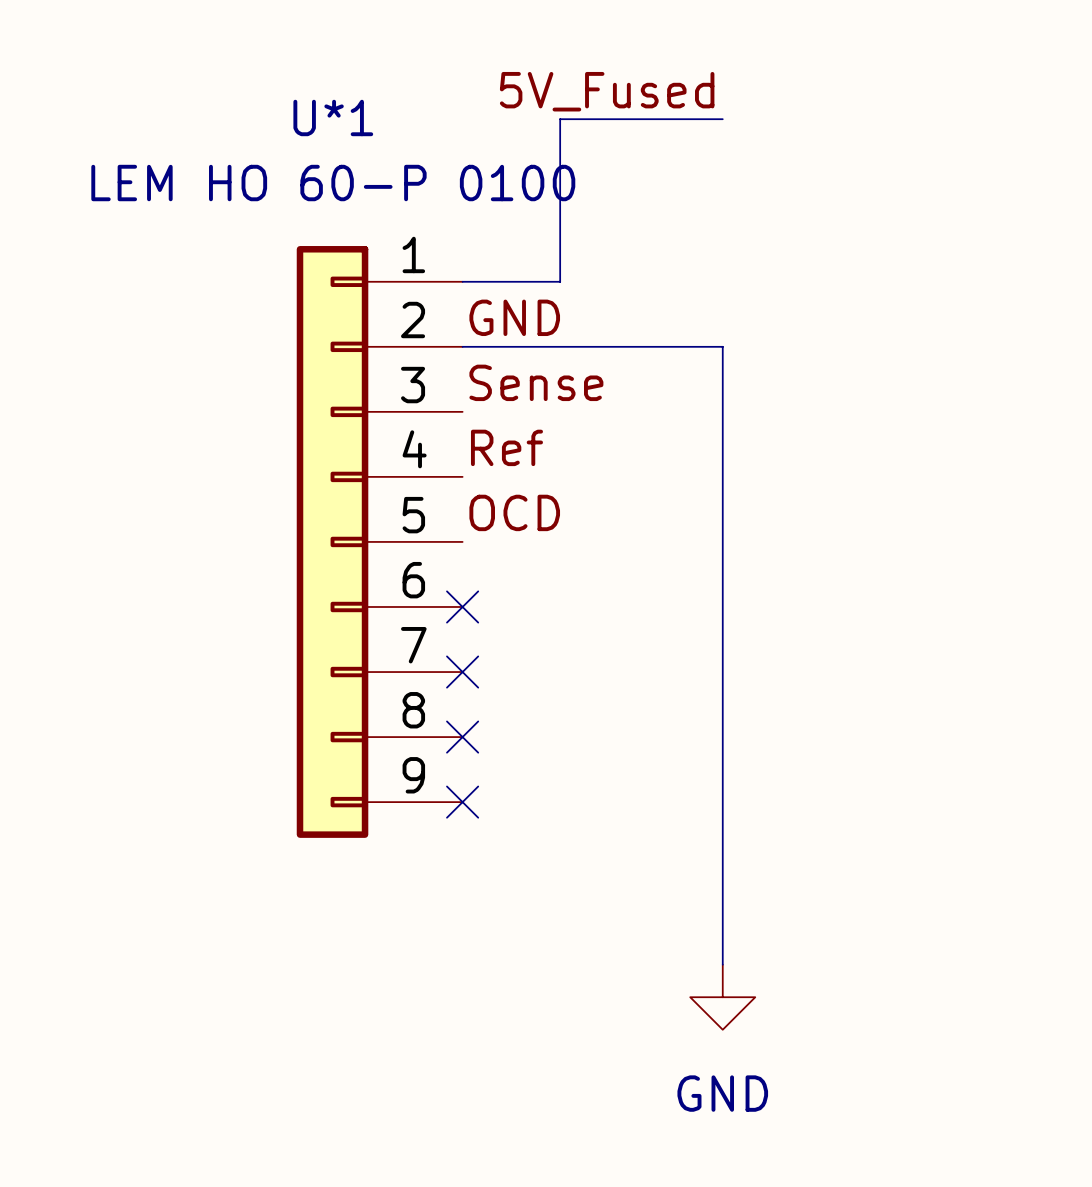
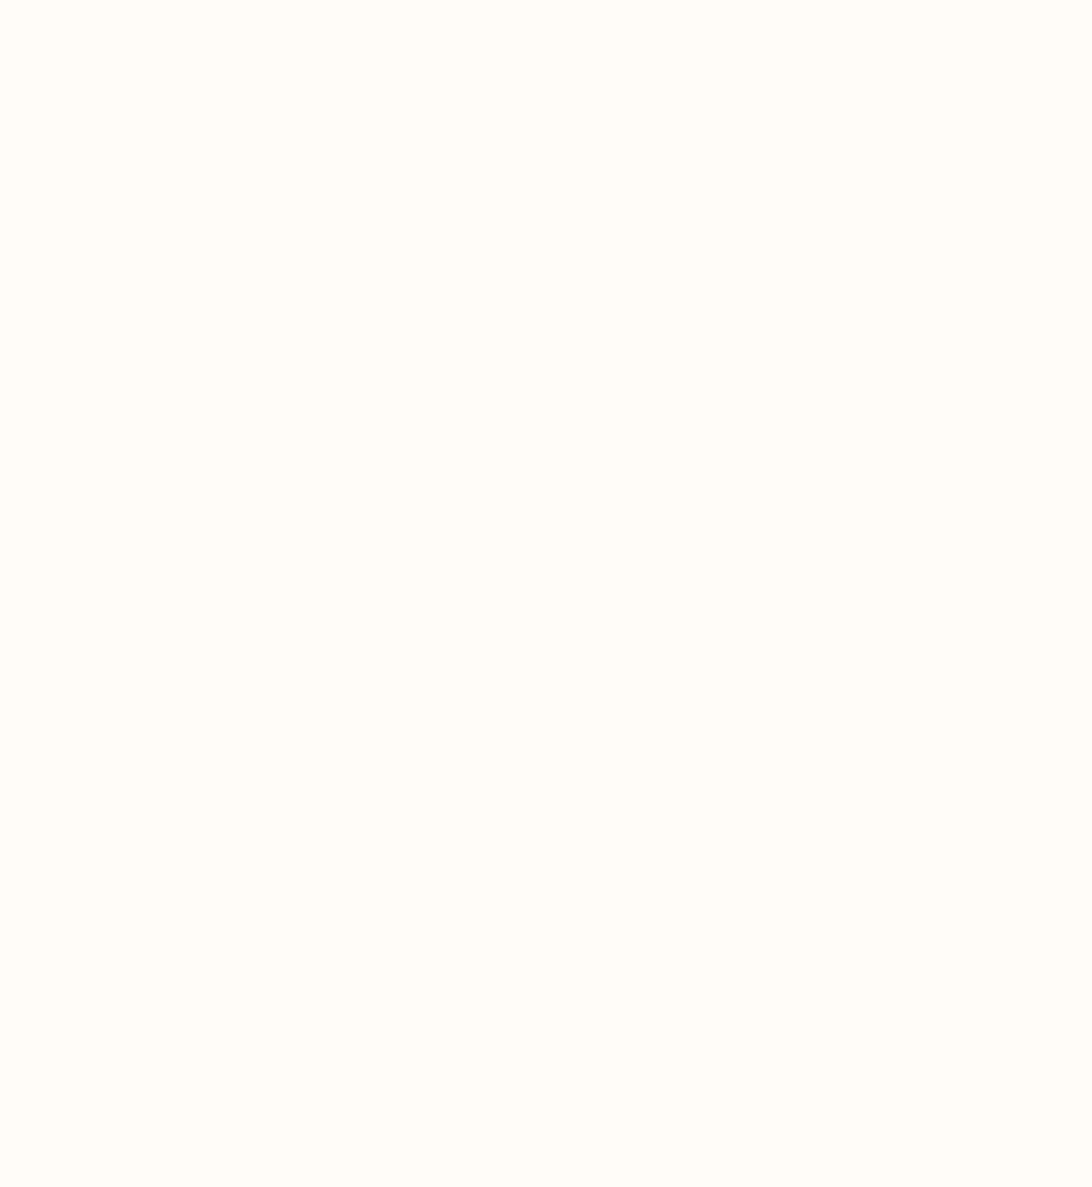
label: 5V_Fused (607, 91) -> none
wire: (722, 119) (560, 119) (560, 281) (462, 281) -> none
label: GND (514, 317) -> none
wire: (462, 346) (722, 346) (722, 964) -> none
label: Sense (536, 382) -> none
label: Ref (506, 447) -> none
label: OCD (514, 512) -> none
U*1: LEM HO 60-P 0100 (379, 541) -> none
no-connect mark: (462, 606) -> none
no-connect mark: (462, 672) -> none
no-connect mark: (462, 737) -> none
no-connect mark: (462, 802) -> none
power symbol: GND (722, 997) -> none

